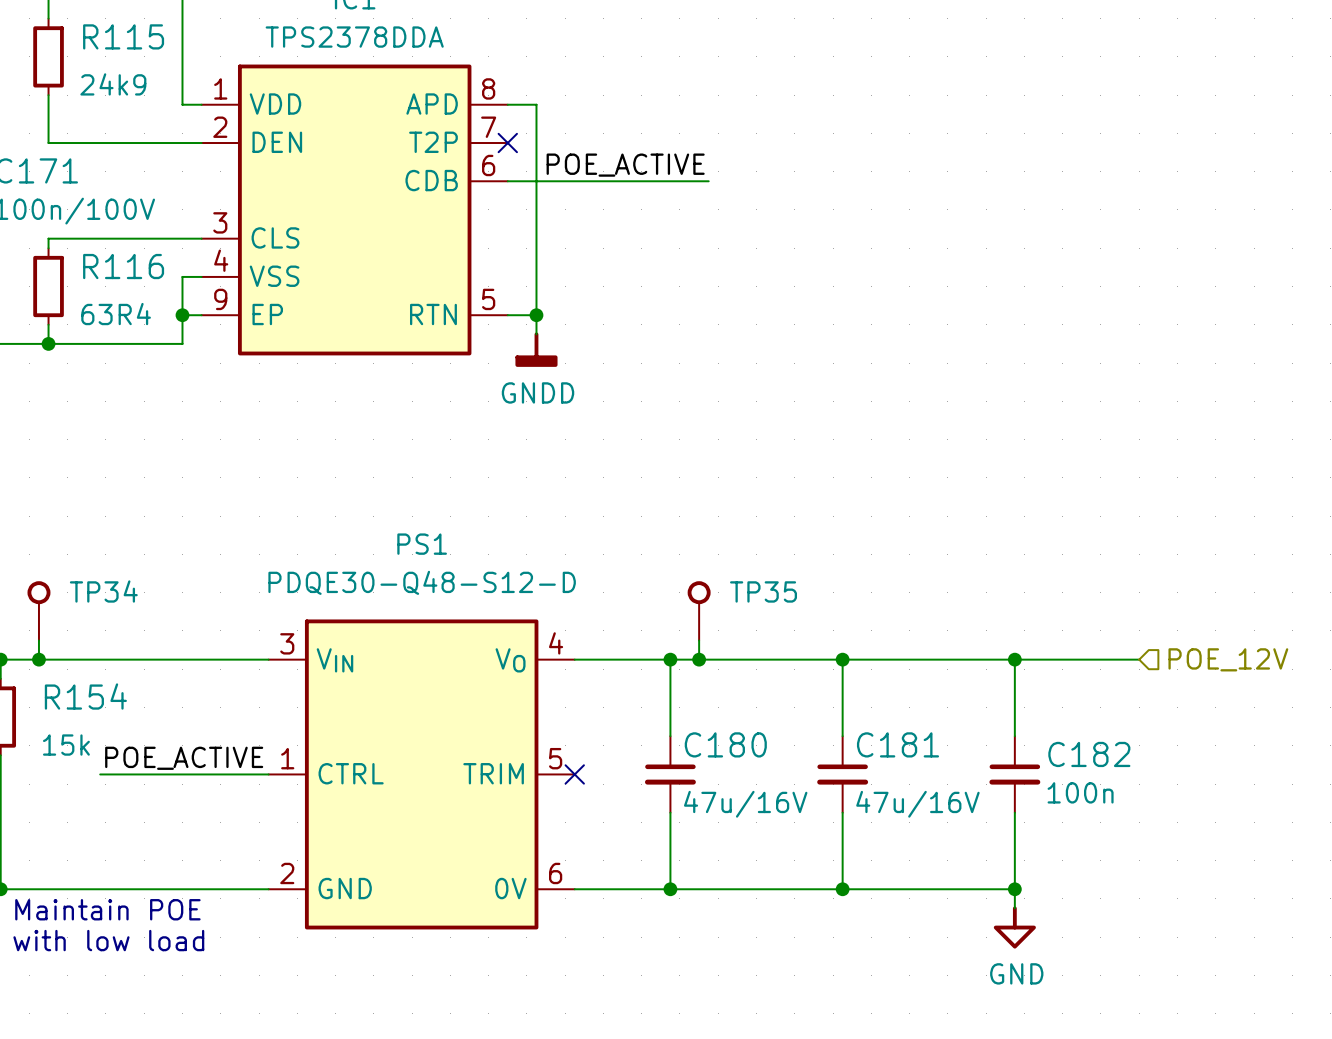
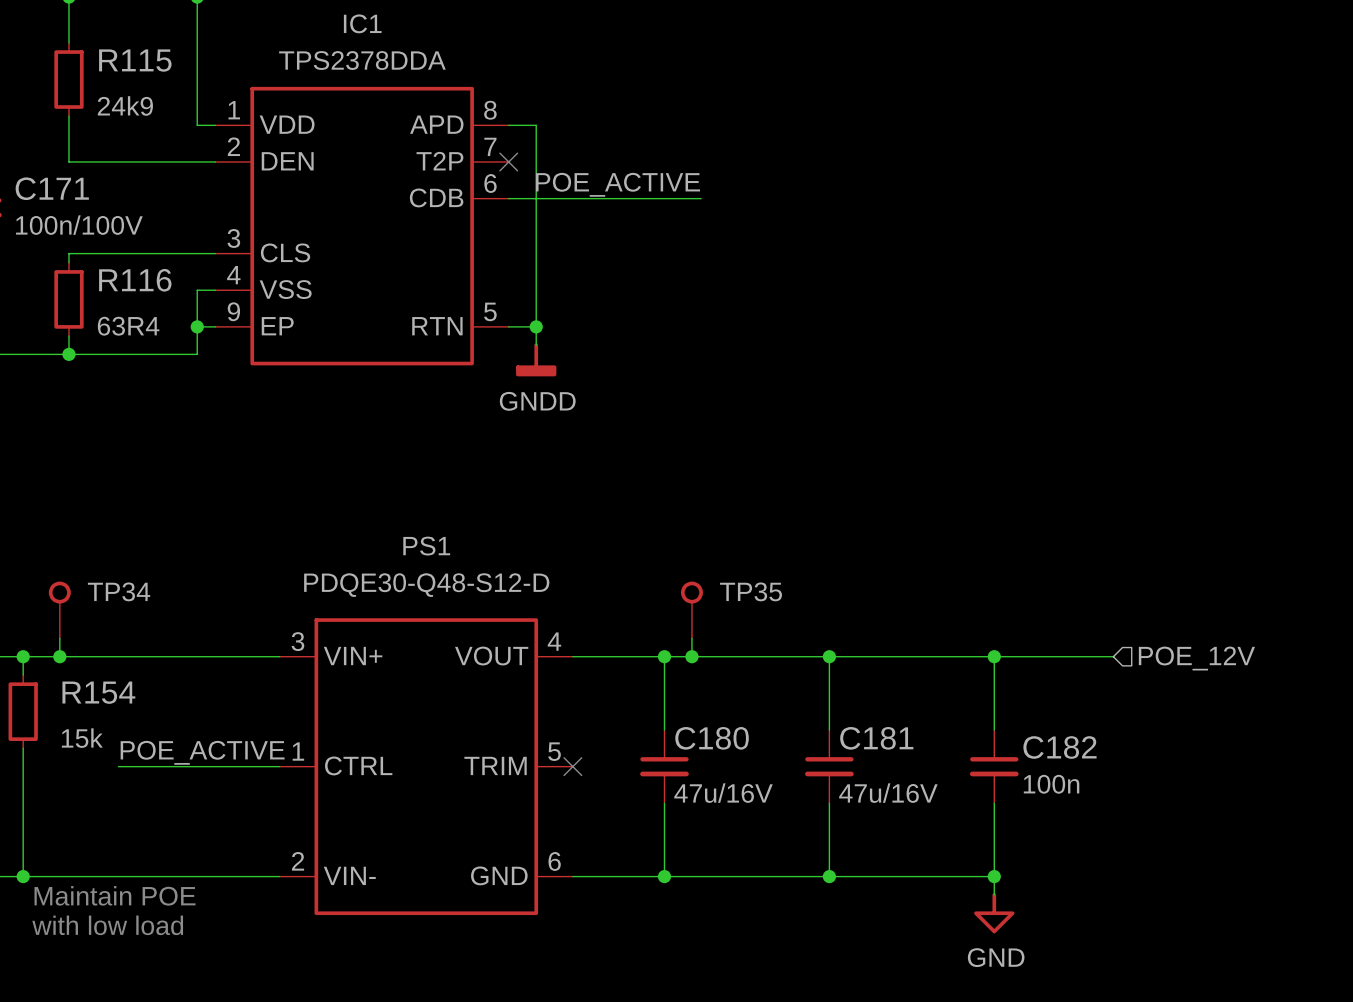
PS1 pin name: VIN (334, 660) -> VIN+ (353, 656)
PS1 pin name: VO (510, 660) -> VOUT (491, 656)
PS1 pin name: GND (345, 888) -> VIN- (349, 875)
PS1 pin name: 0V (510, 888) -> GND (499, 875)

